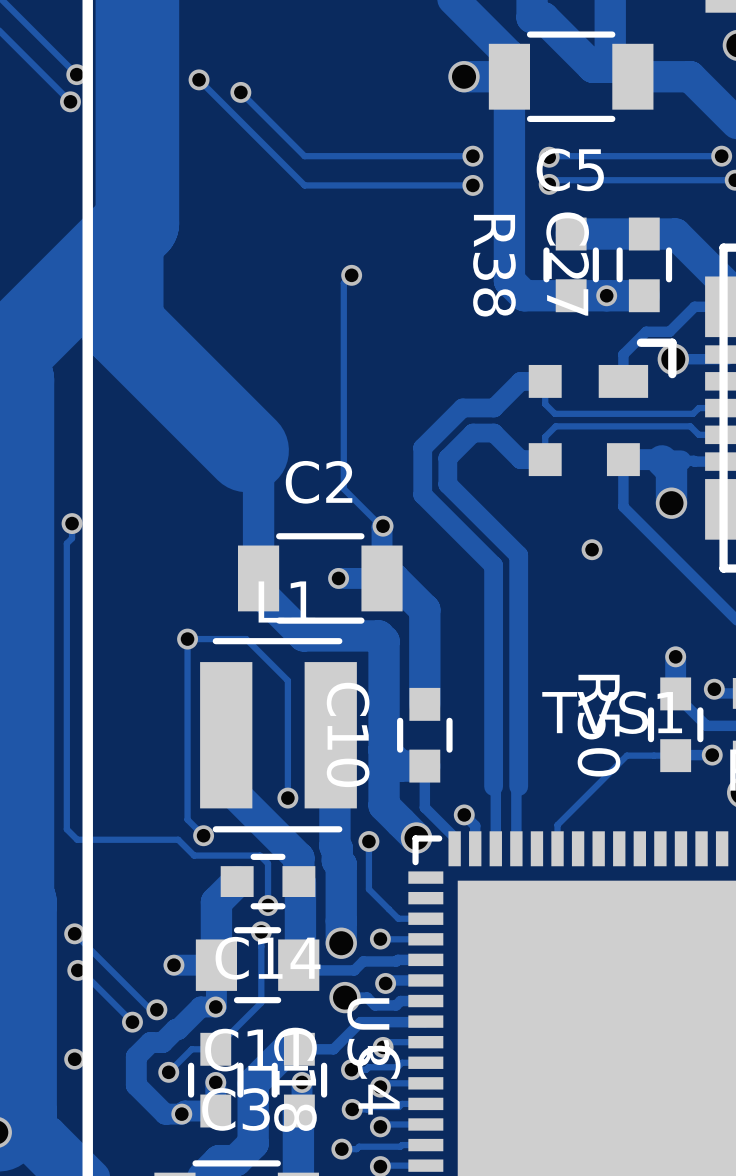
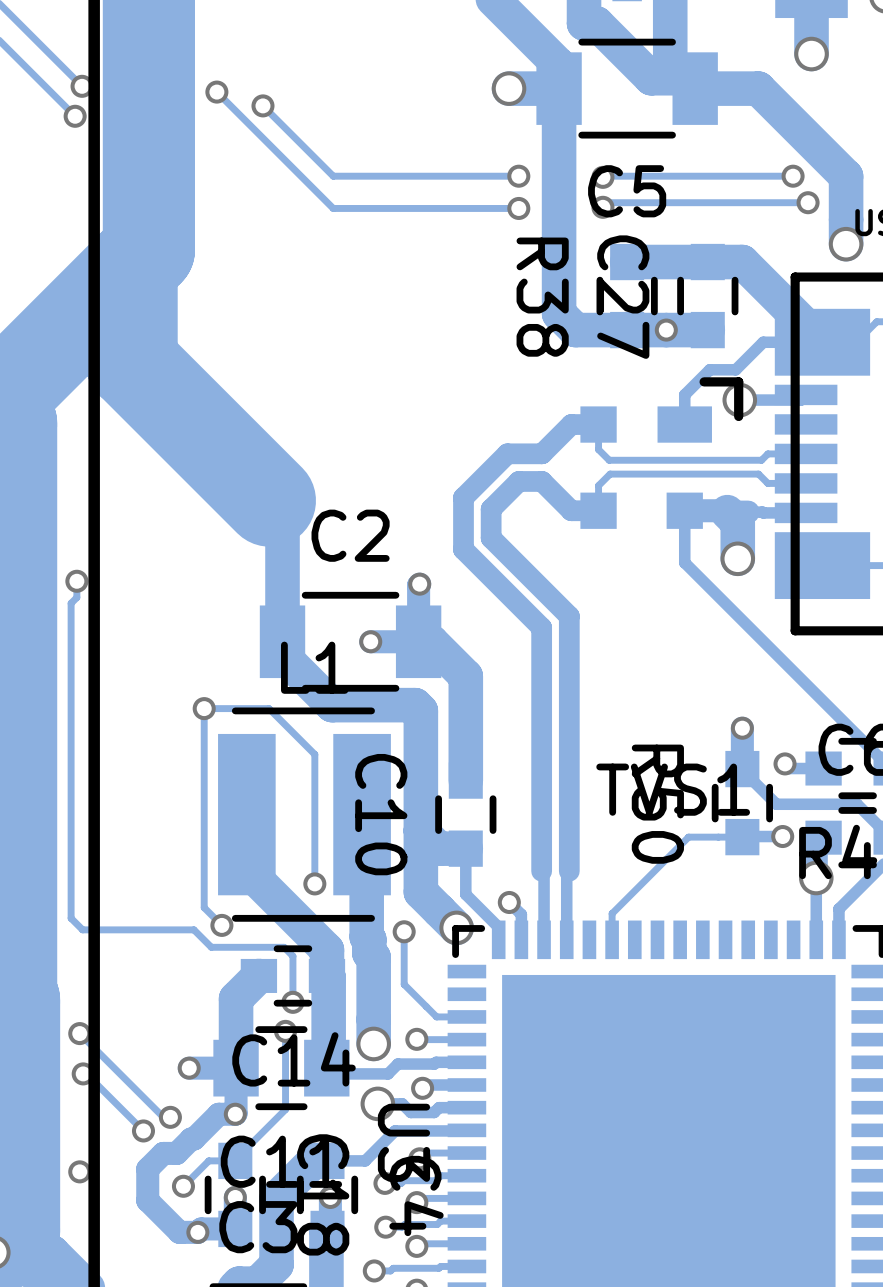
track: (351, 275) (343, 283) (343, 488) (382, 527) -> none
via: (351, 275) -> none
via: (592, 549) -> none

